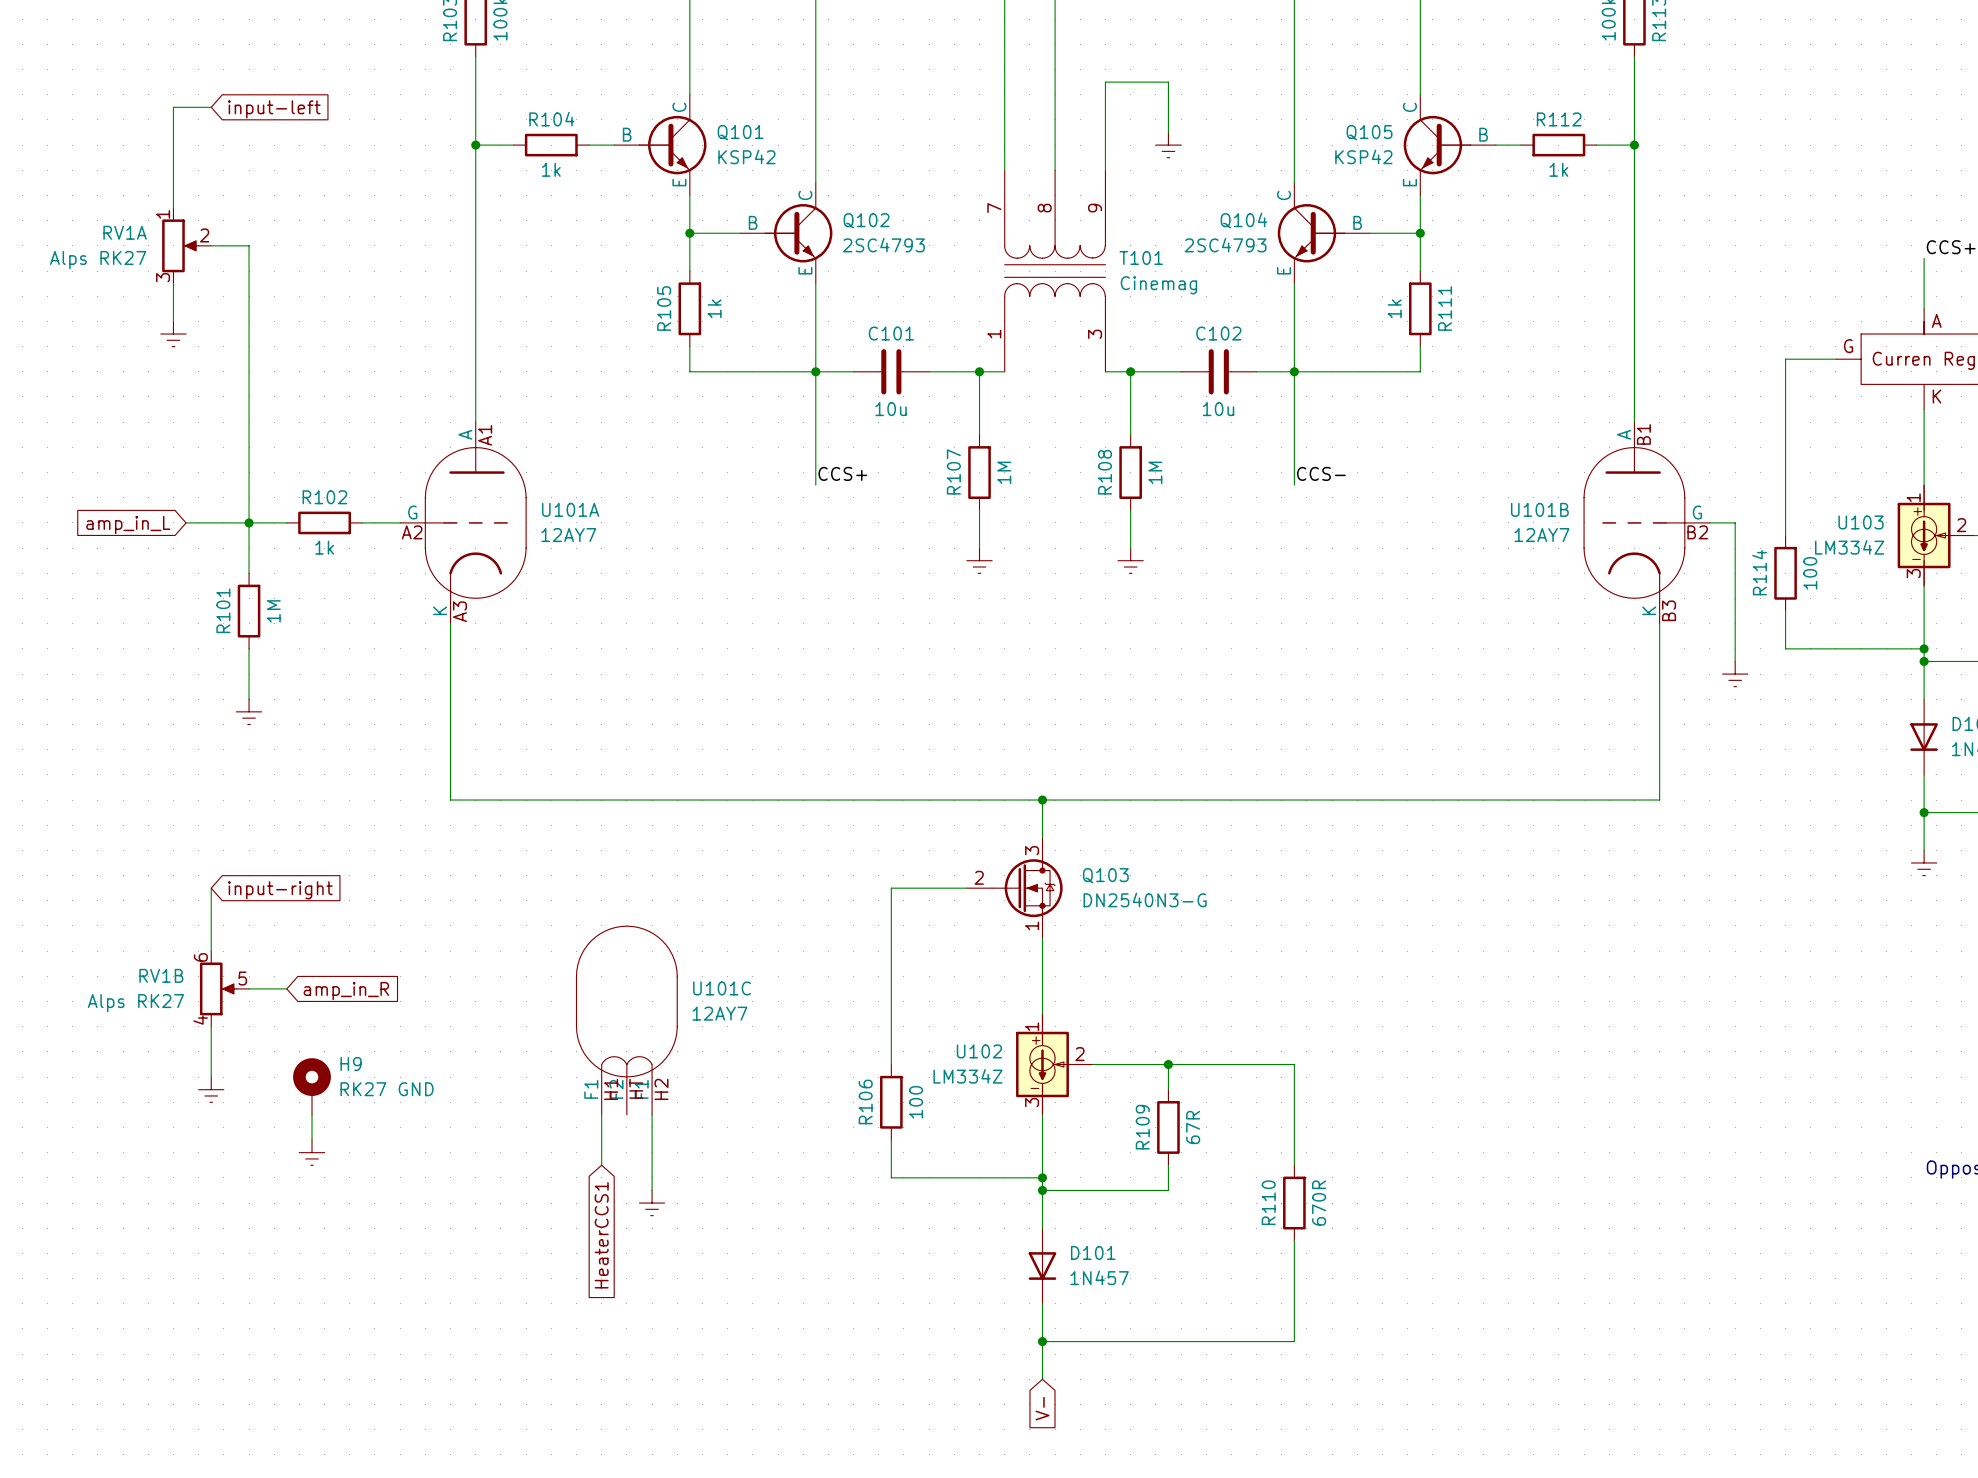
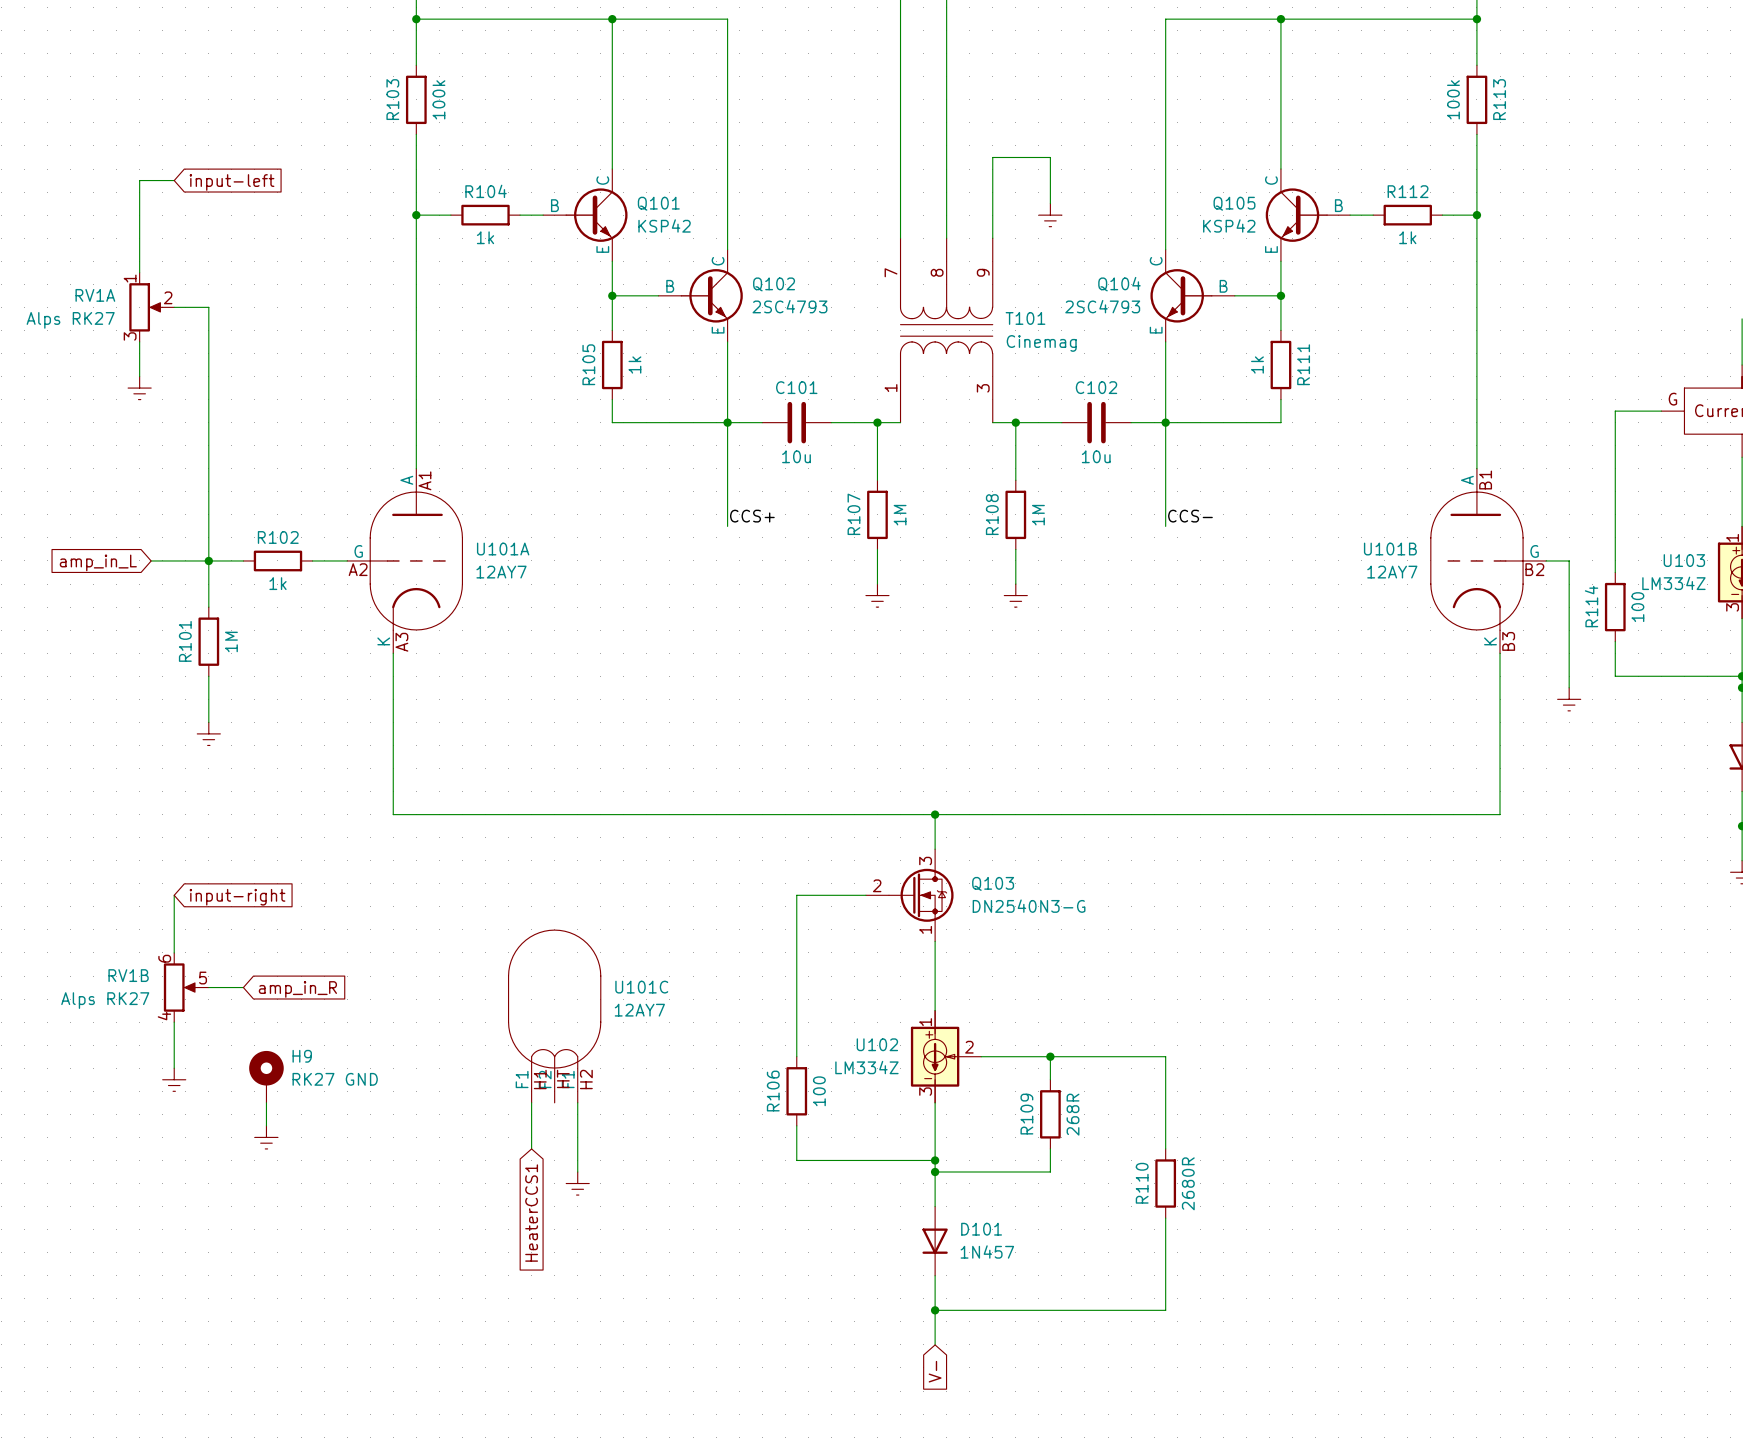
R109 value: 67R (1193, 1127) -> 268R (1073, 1114)
R110 value: 670R (1319, 1203) -> 2680R (1188, 1183)

